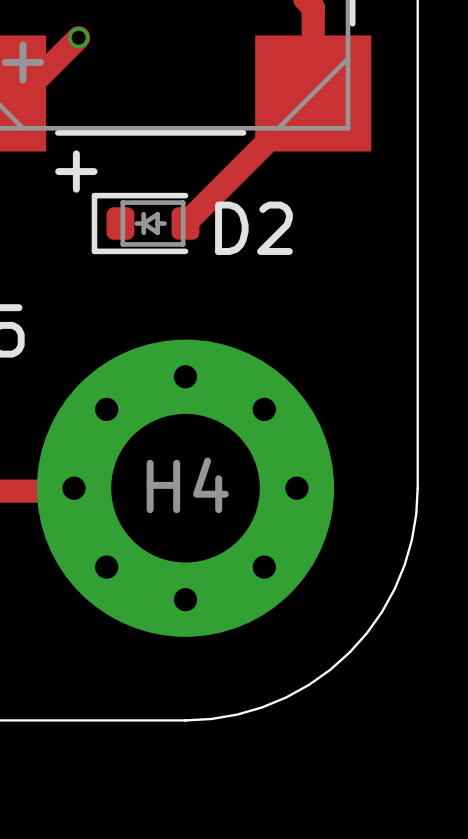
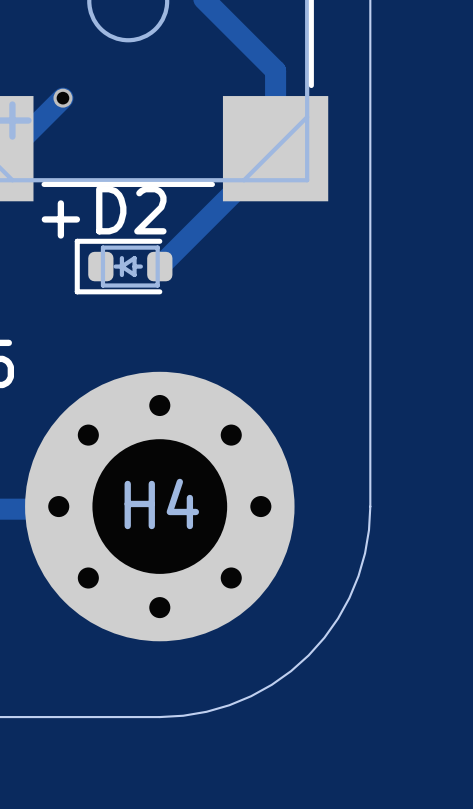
D2 name position: D2 (253, 228) -> D2 (131, 210)

